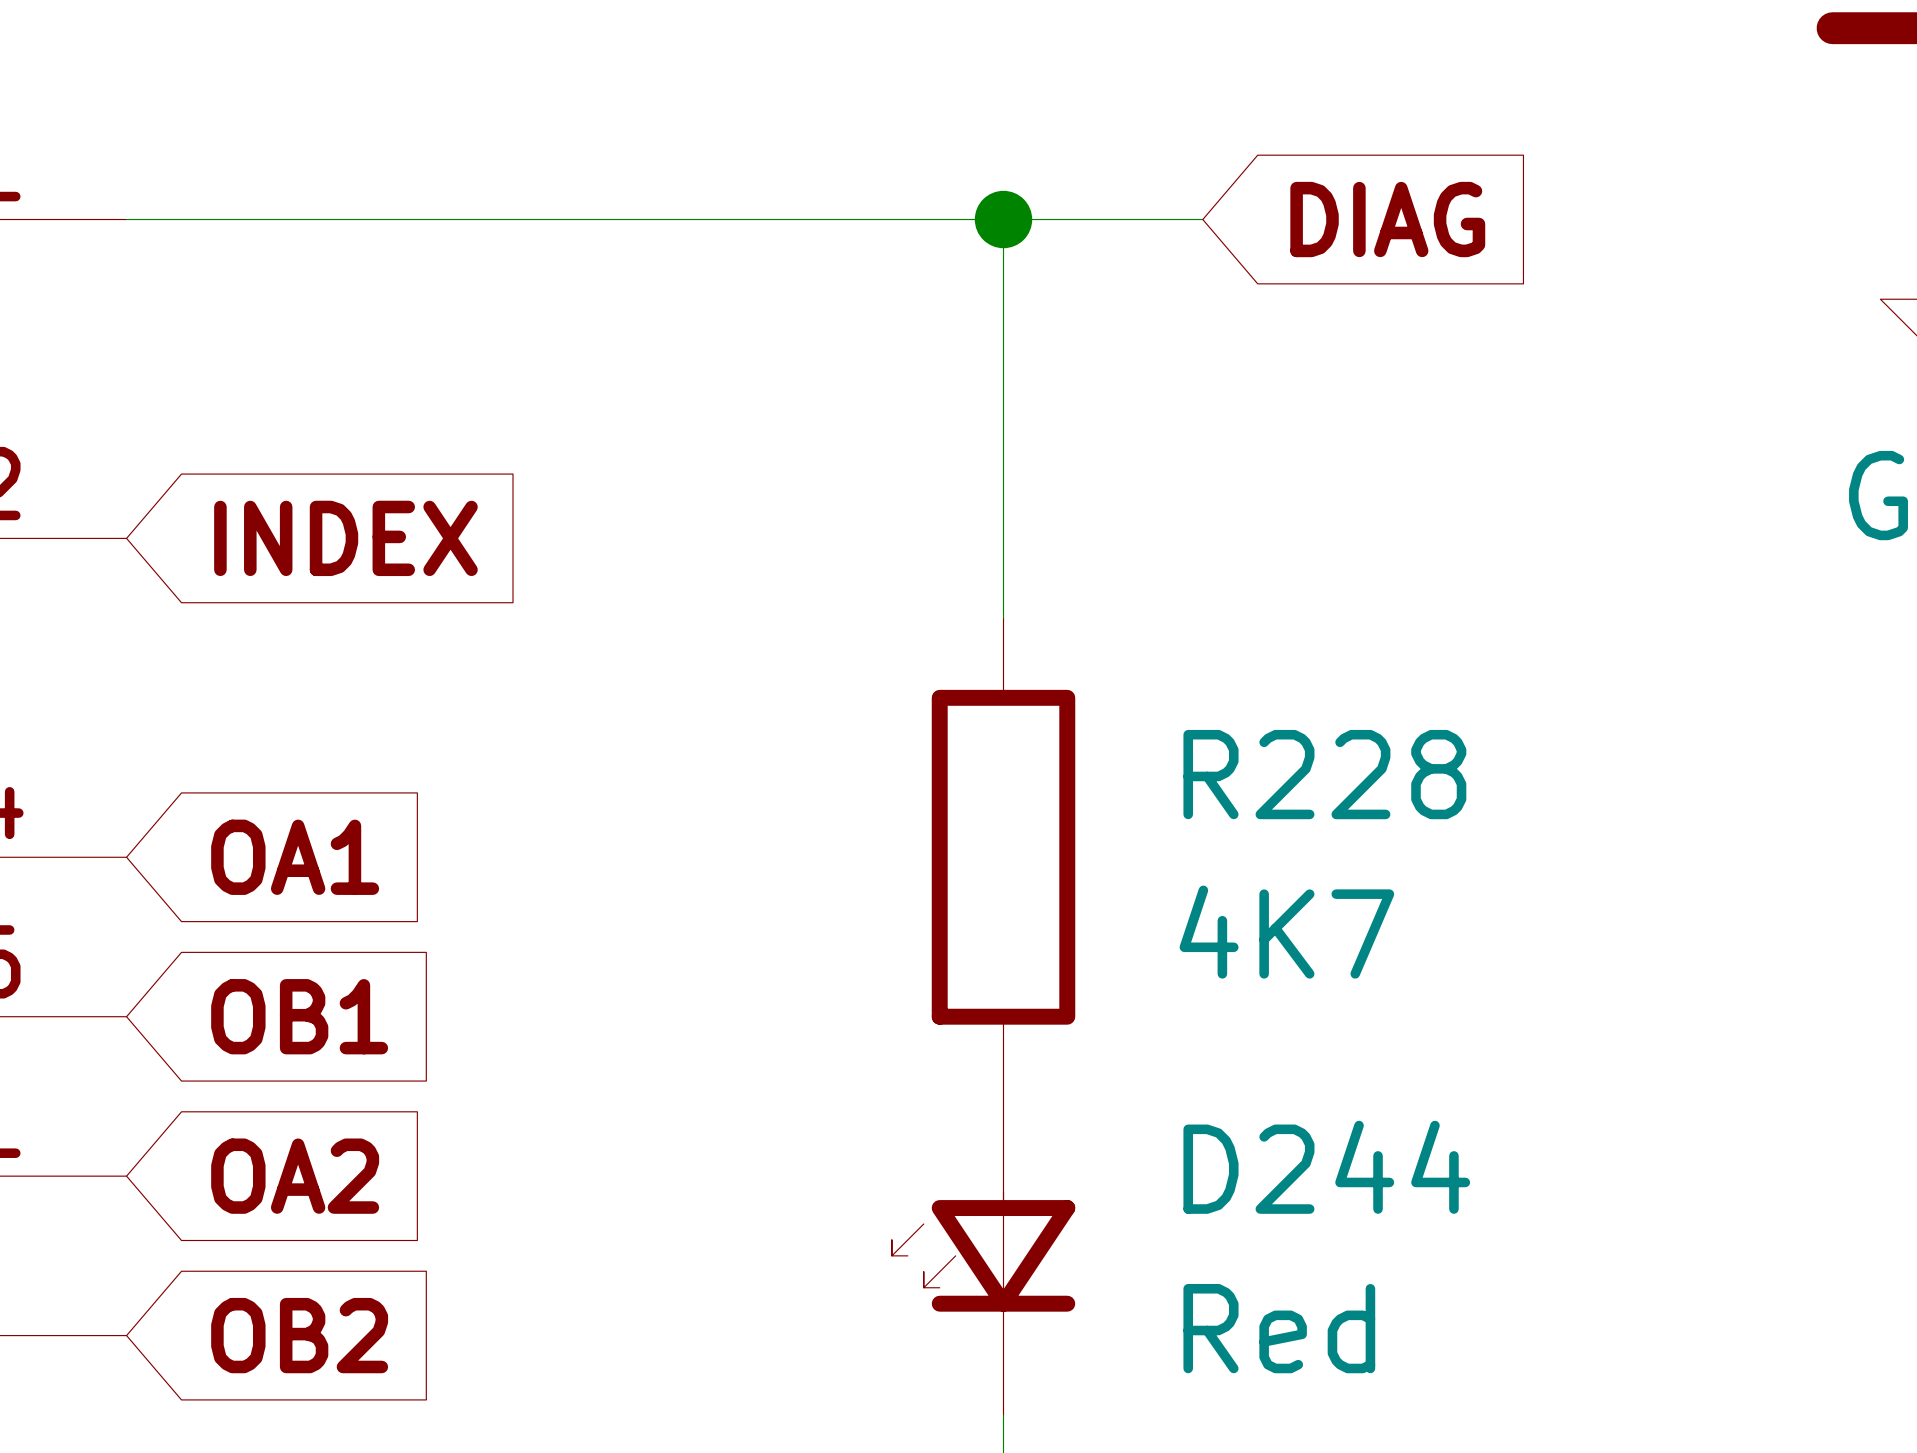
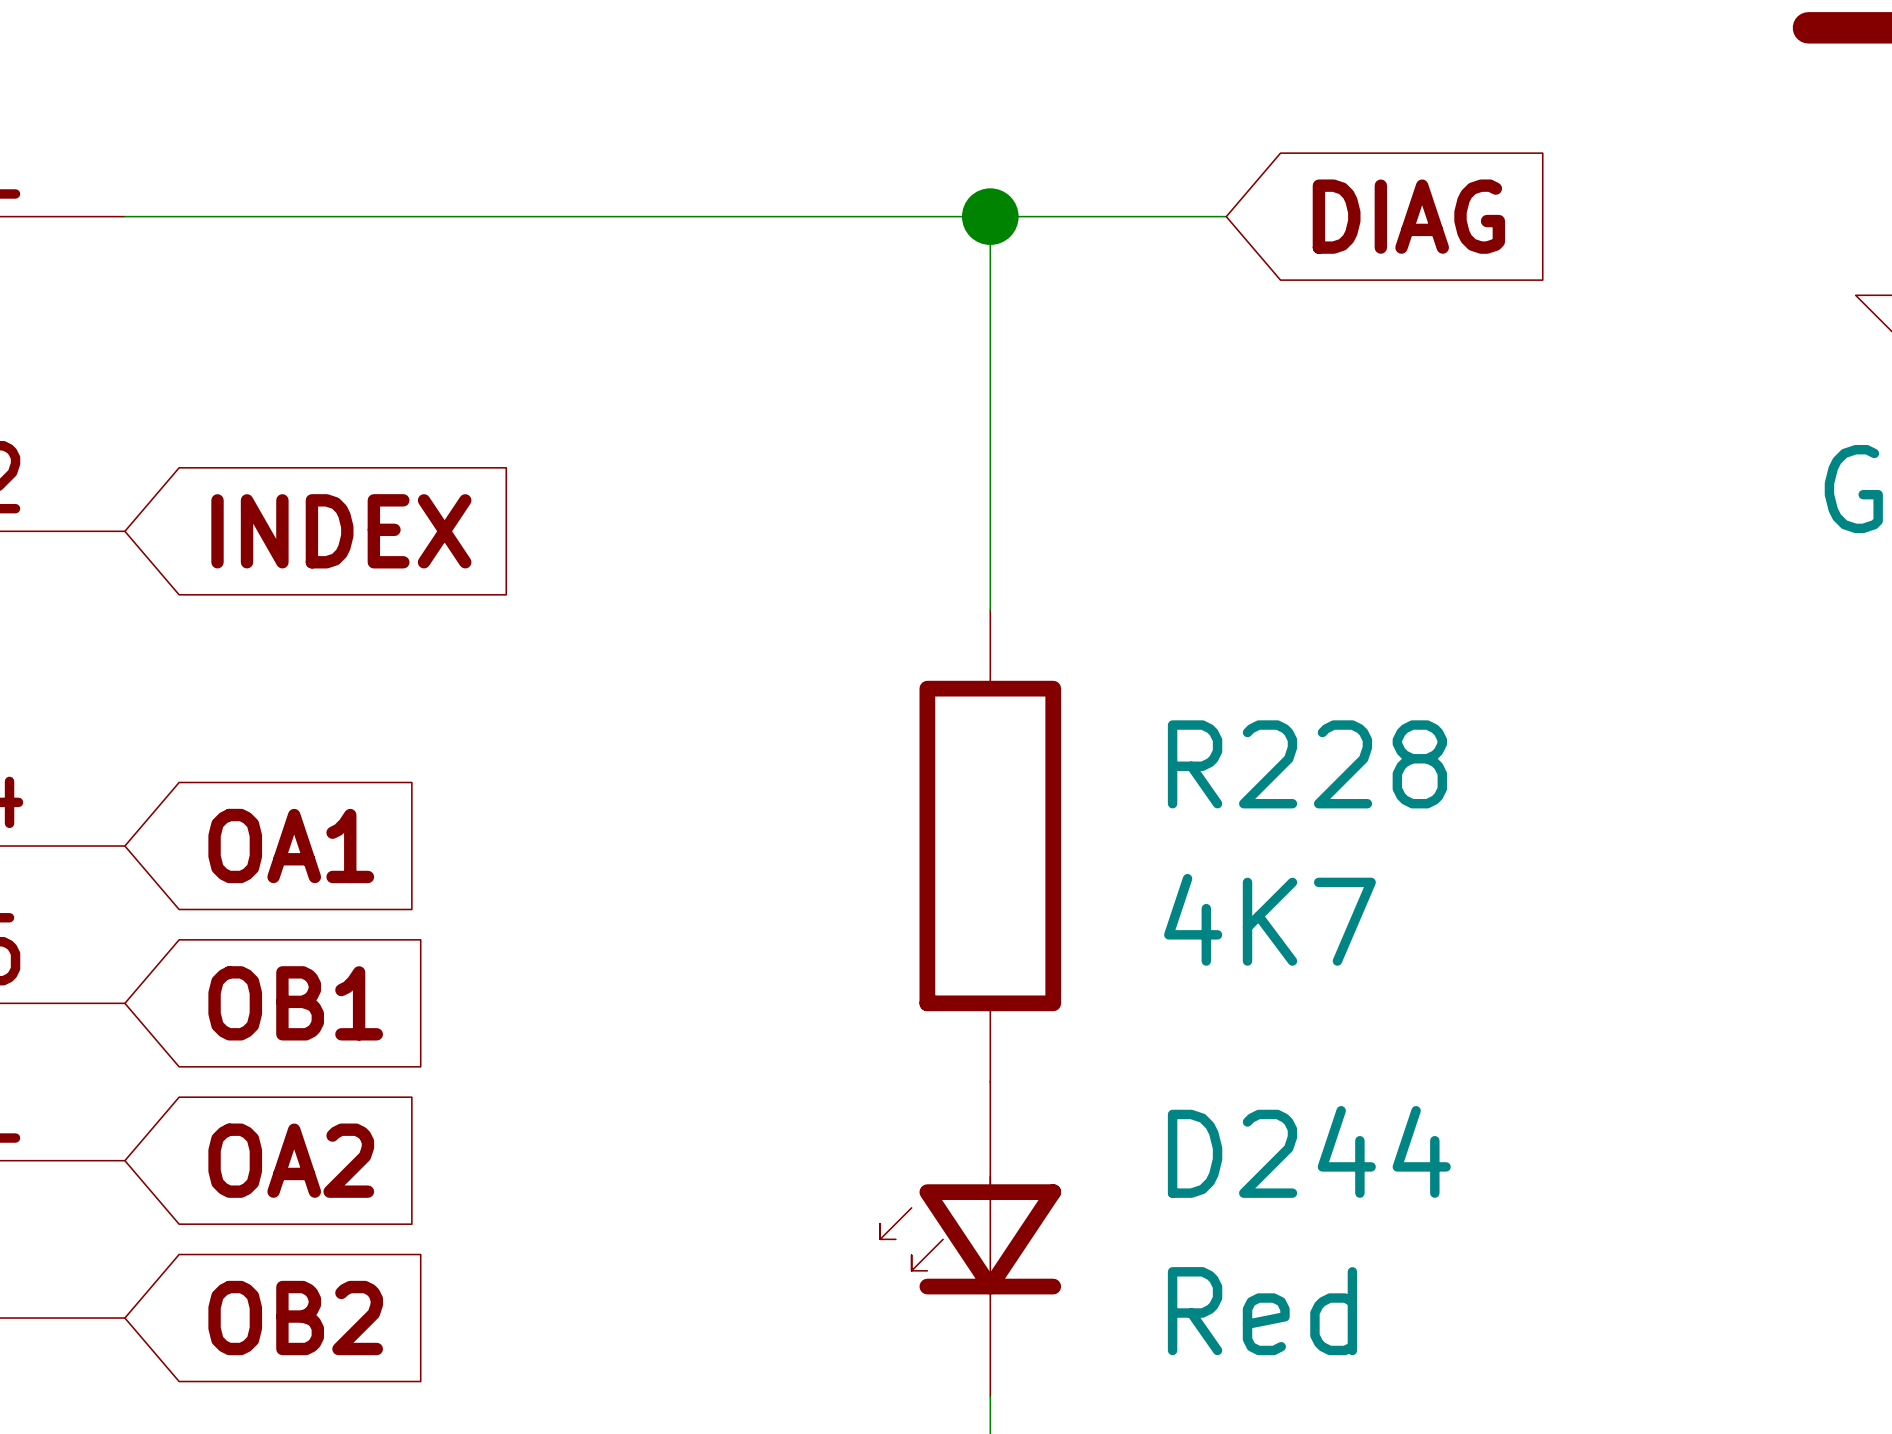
wire: none -> (1186, 216) (1226, 216)
global label position: DIAG (1387, 219) -> DIAG (1408, 216)

